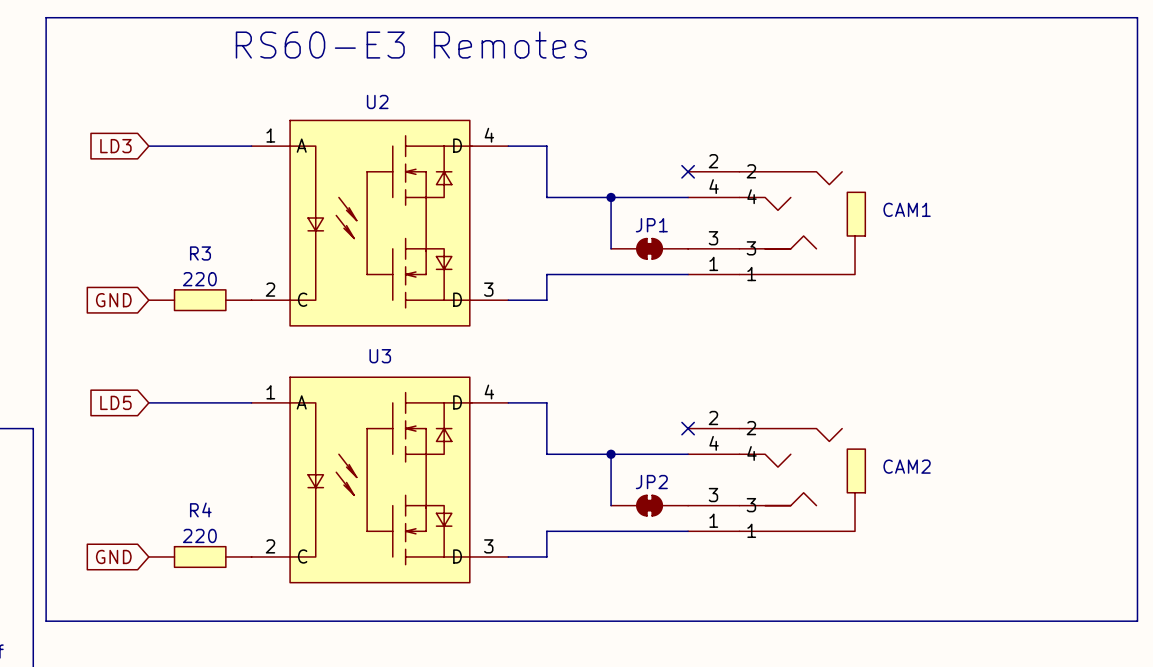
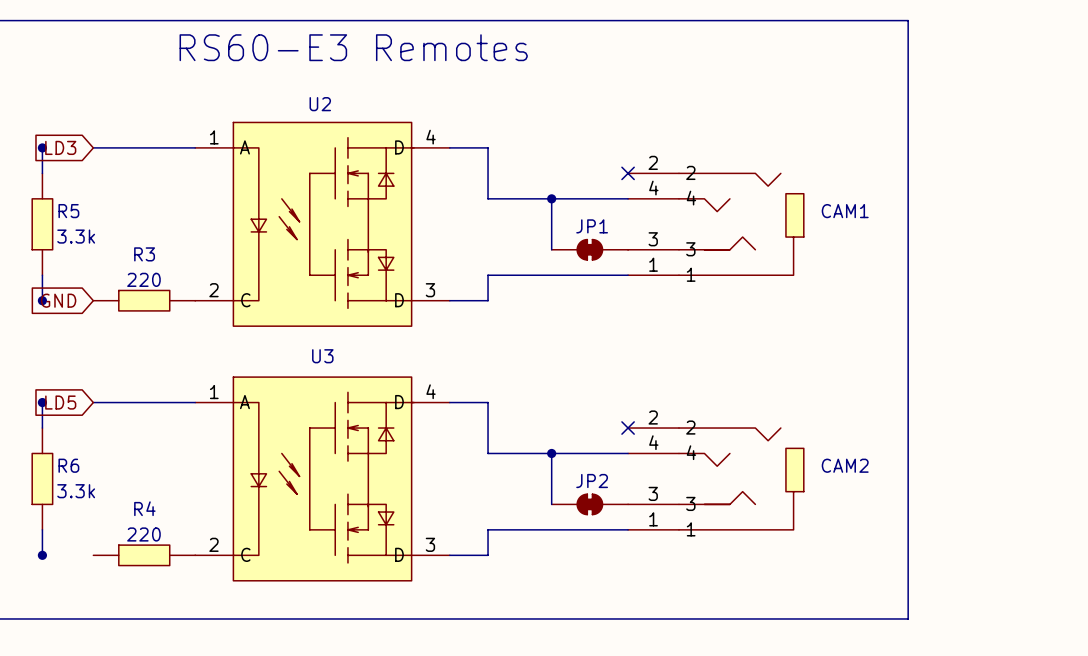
line: (970, 17) (1137, 17) (1137, 621) (970, 621) -> (908, 20) (908, 618)
wire: none -> (42, 147) (42, 173)
junction: none -> (42, 147)
R5: none -> 3.3k (42, 224)
wire: none -> (42, 275) (42, 300)
junction: none -> (42, 300)
wire: none -> (42, 402) (42, 428)
junction: none -> (42, 402)
R6: none -> 3.3k (42, 478)
wire: none -> (42, 529) (42, 555)
junction: none -> (42, 555)
global label: GND (113, 556) -> none

